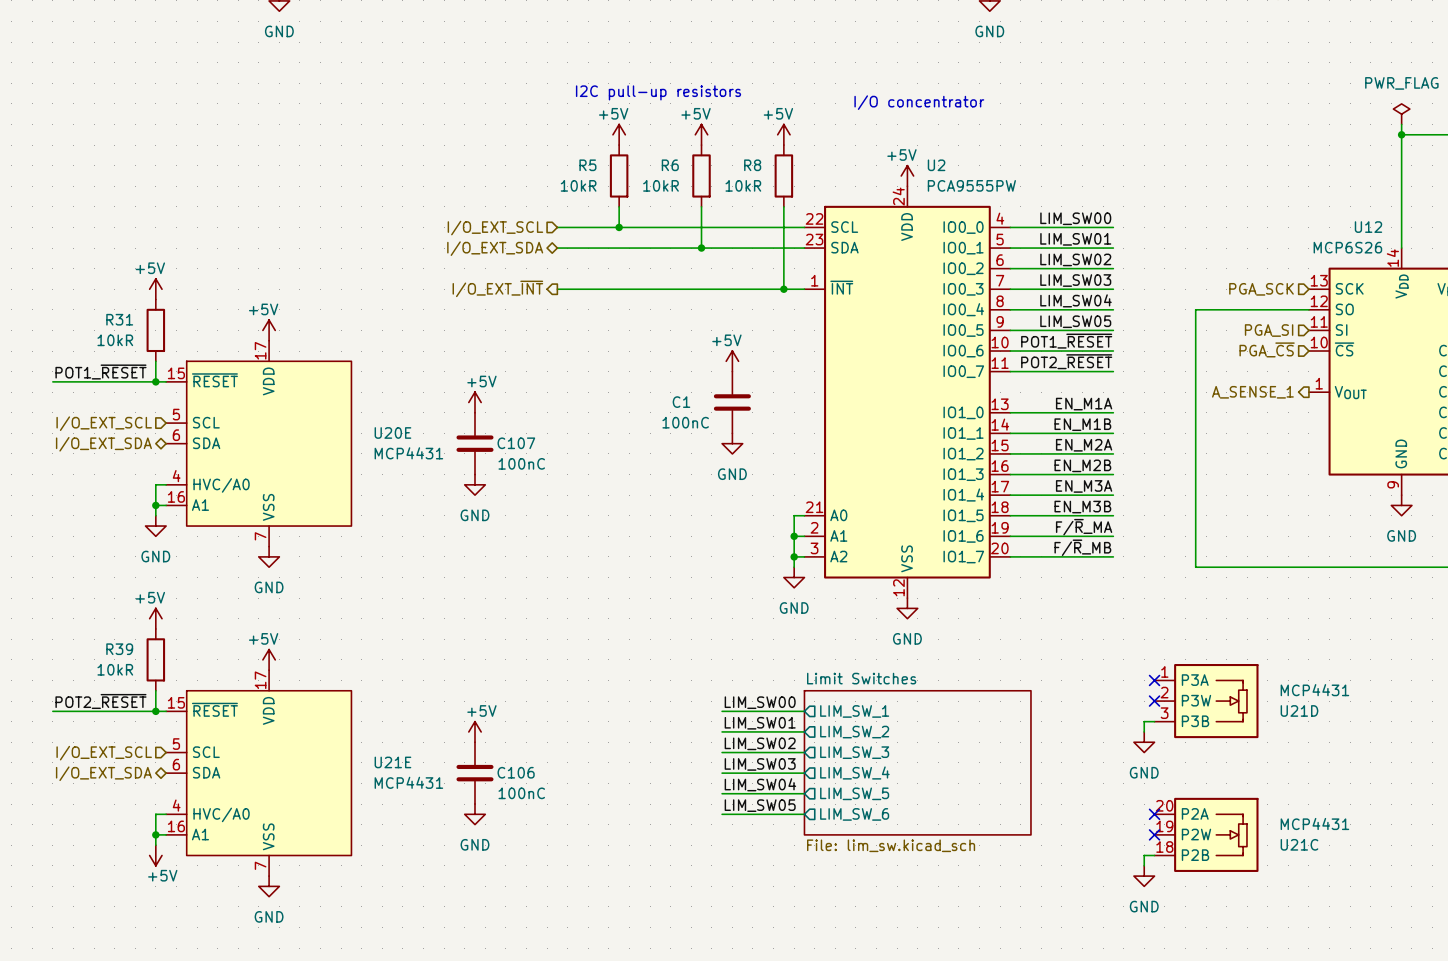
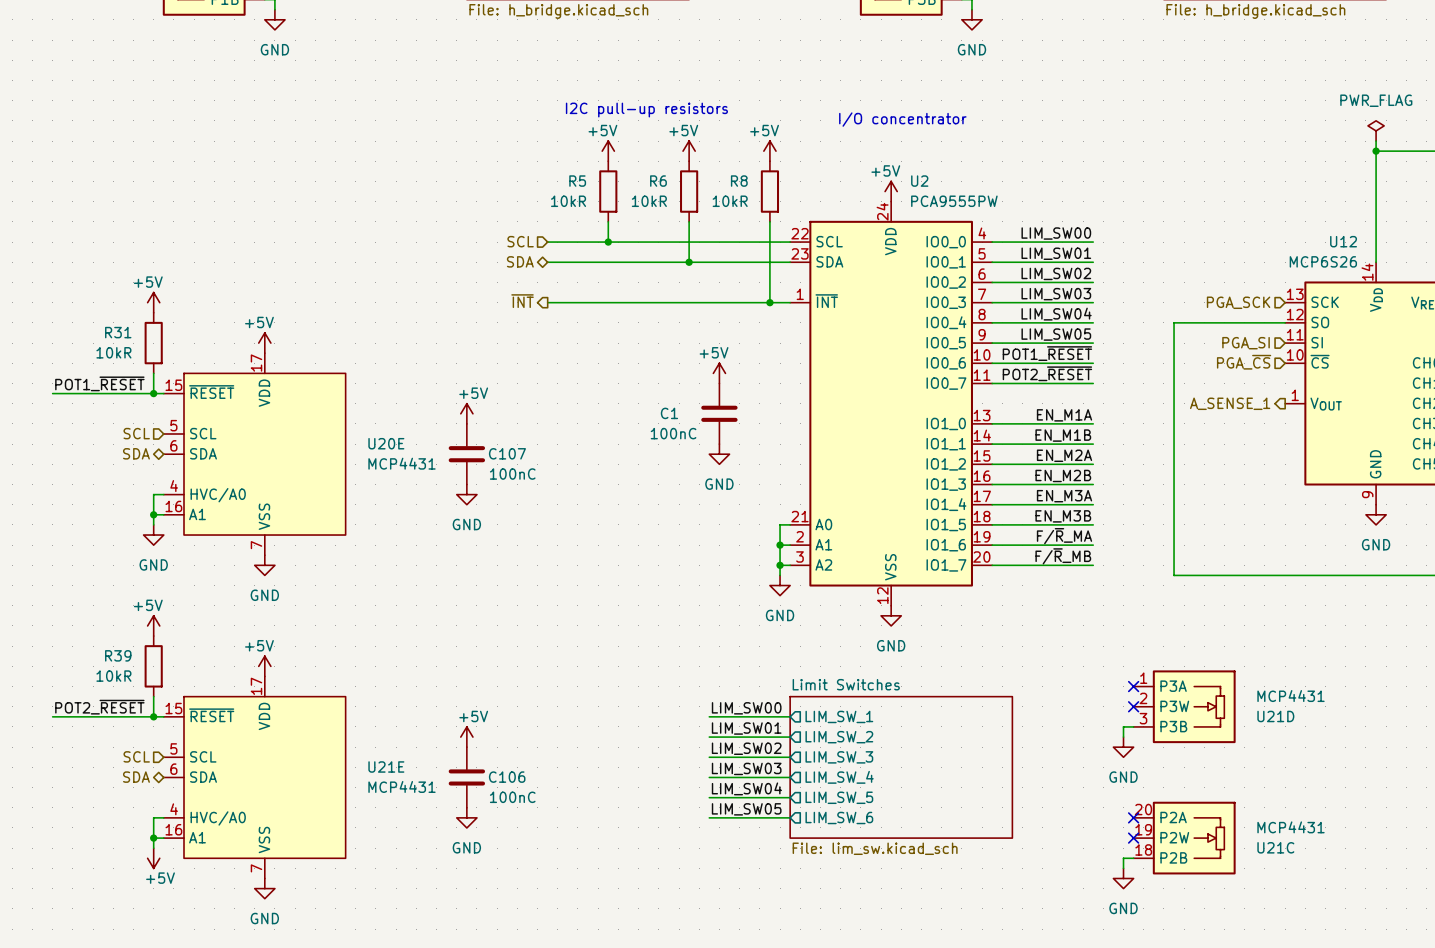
hierarchical label: I/O_EXT_SCL (495, 228) -> SCL (520, 241)
hierarchical label: I/O_EXT_SDA (495, 248) -> SDA (520, 261)
hierarchical label: I/O_EXT_~{INT} (497, 288) -> ~{INT} (522, 301)
hierarchical label: I/O_EXT_SCL (104, 423) -> SCL (136, 433)
hierarchical label: I/O_EXT_SDA (103, 444) -> SDA (136, 453)
hierarchical label: I/O_EXT_SCL (104, 753) -> SCL (136, 756)
hierarchical label: I/O_EXT_SDA (103, 773) -> SDA (136, 777)

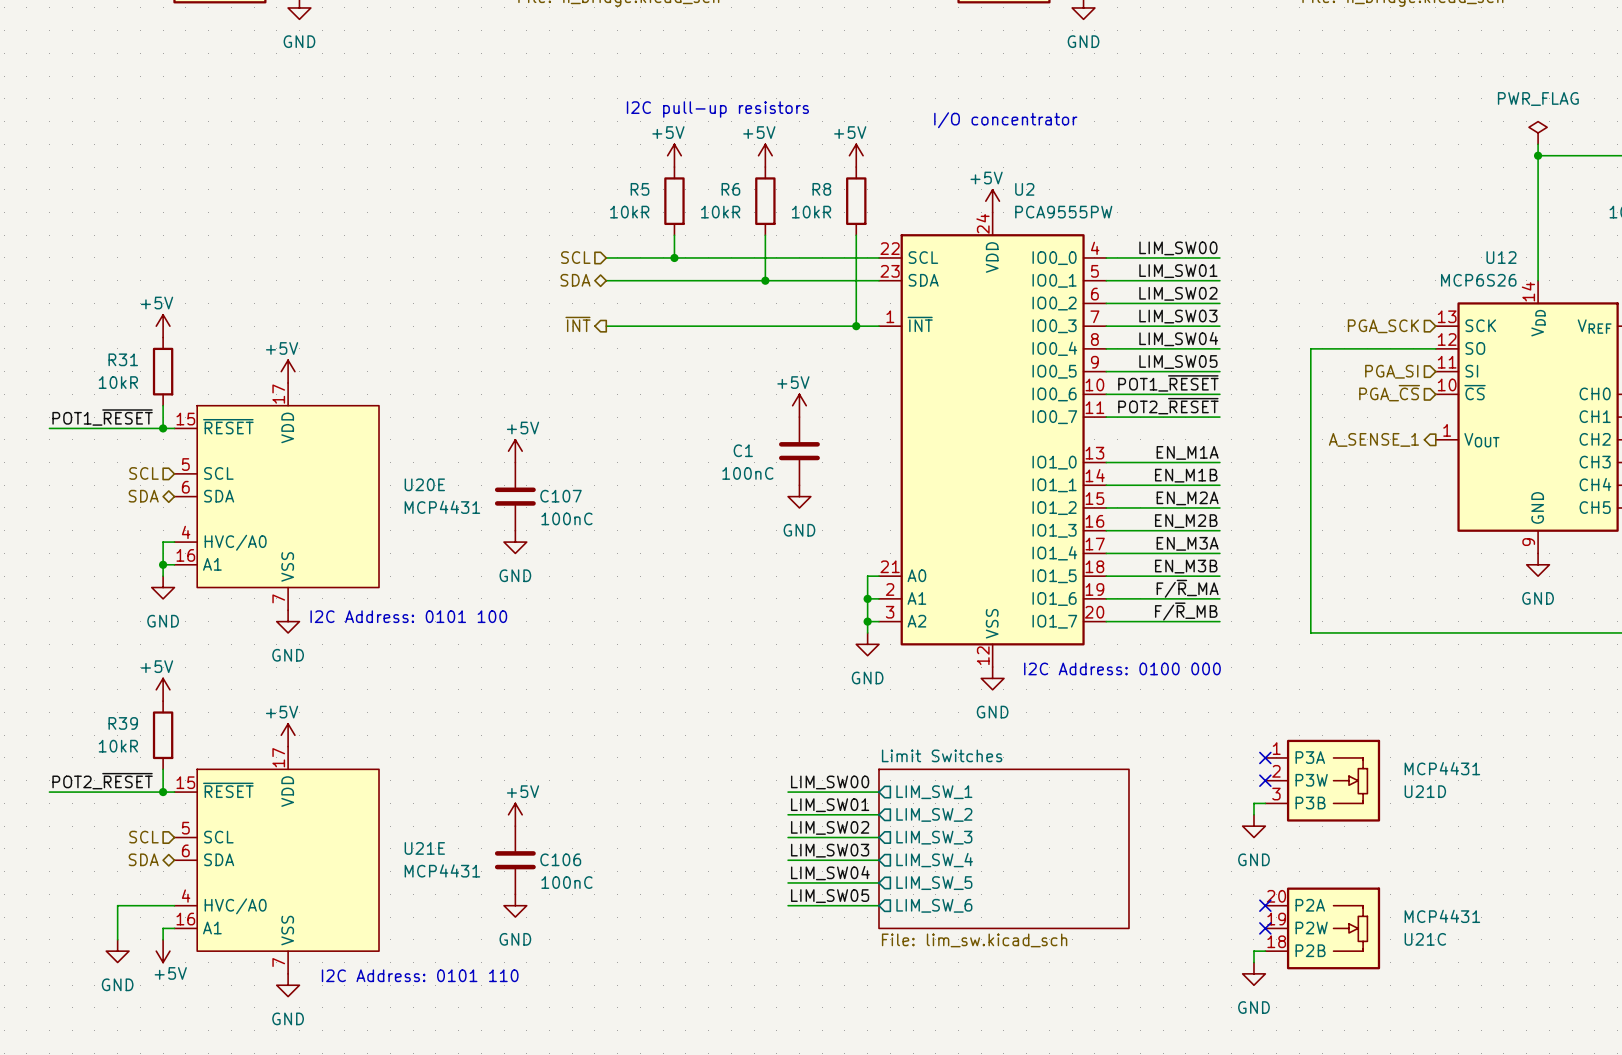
text: none -> I2C Address: 0101 100 (408, 616)
text: none -> I2C Address: 0100 000 (1122, 668)
wire: (153, 817) (153, 838) -> (163, 905) (117, 905) (117, 939)
junction: (153, 838) -> none
power symbol: none -> GND (117, 951)
text: none -> I2C Address: 0101 110 (420, 975)

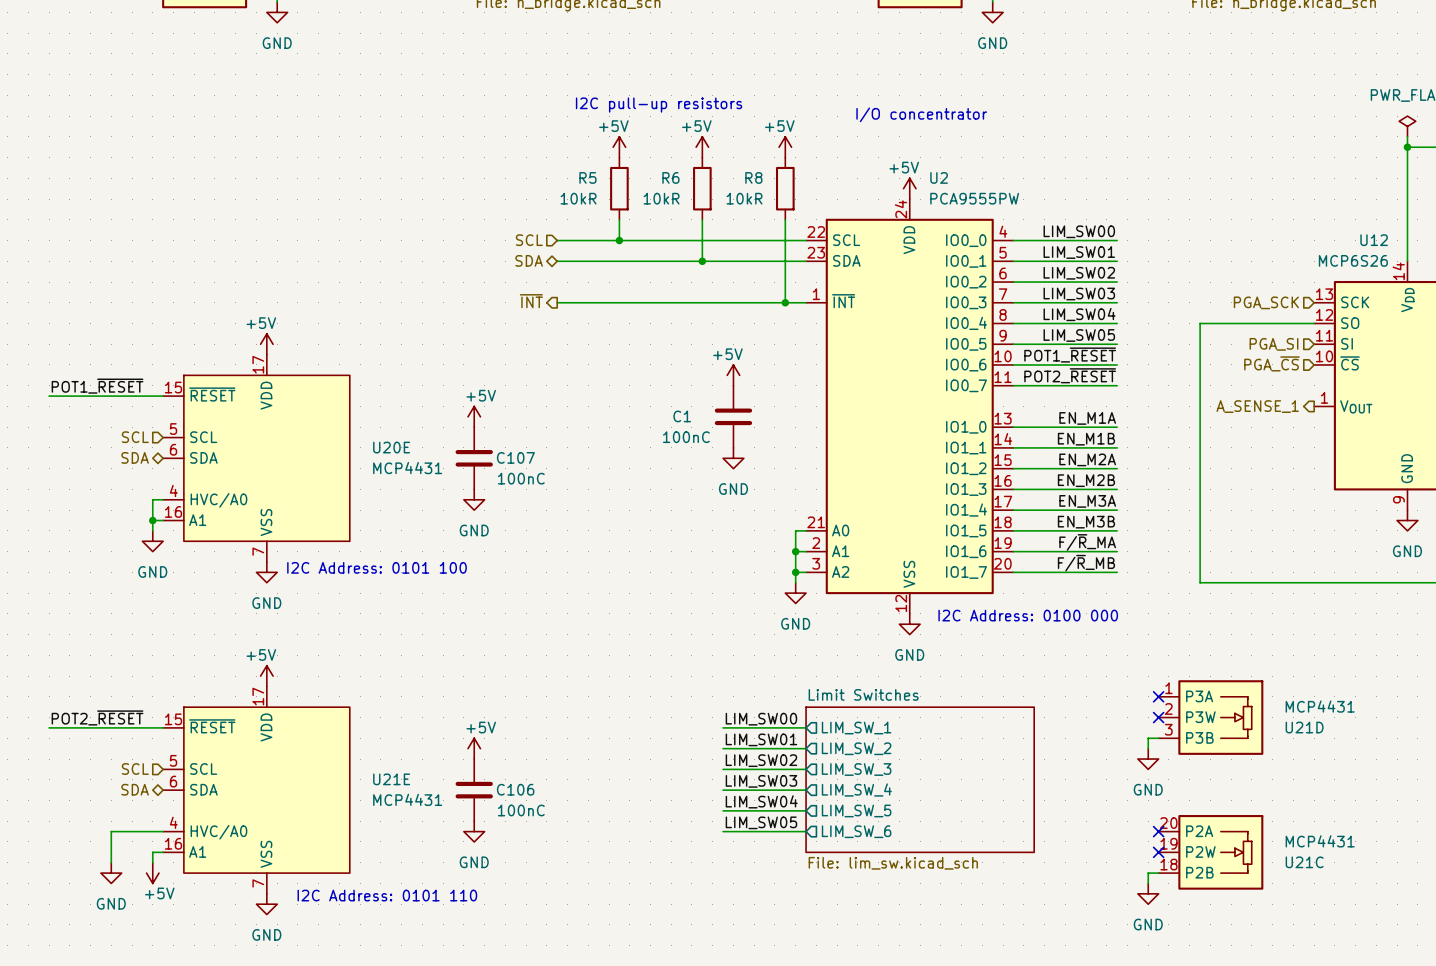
power symbol: +5V (163, 326) -> none
R31: 10kR (163, 371) -> none
wire: (163, 405) (163, 428) -> none
junction: (163, 428) -> none
power symbol: +5V (163, 689) -> none
R39: 10kR (163, 735) -> none
wire: (163, 769) (163, 792) -> none
junction: (163, 792) -> none

